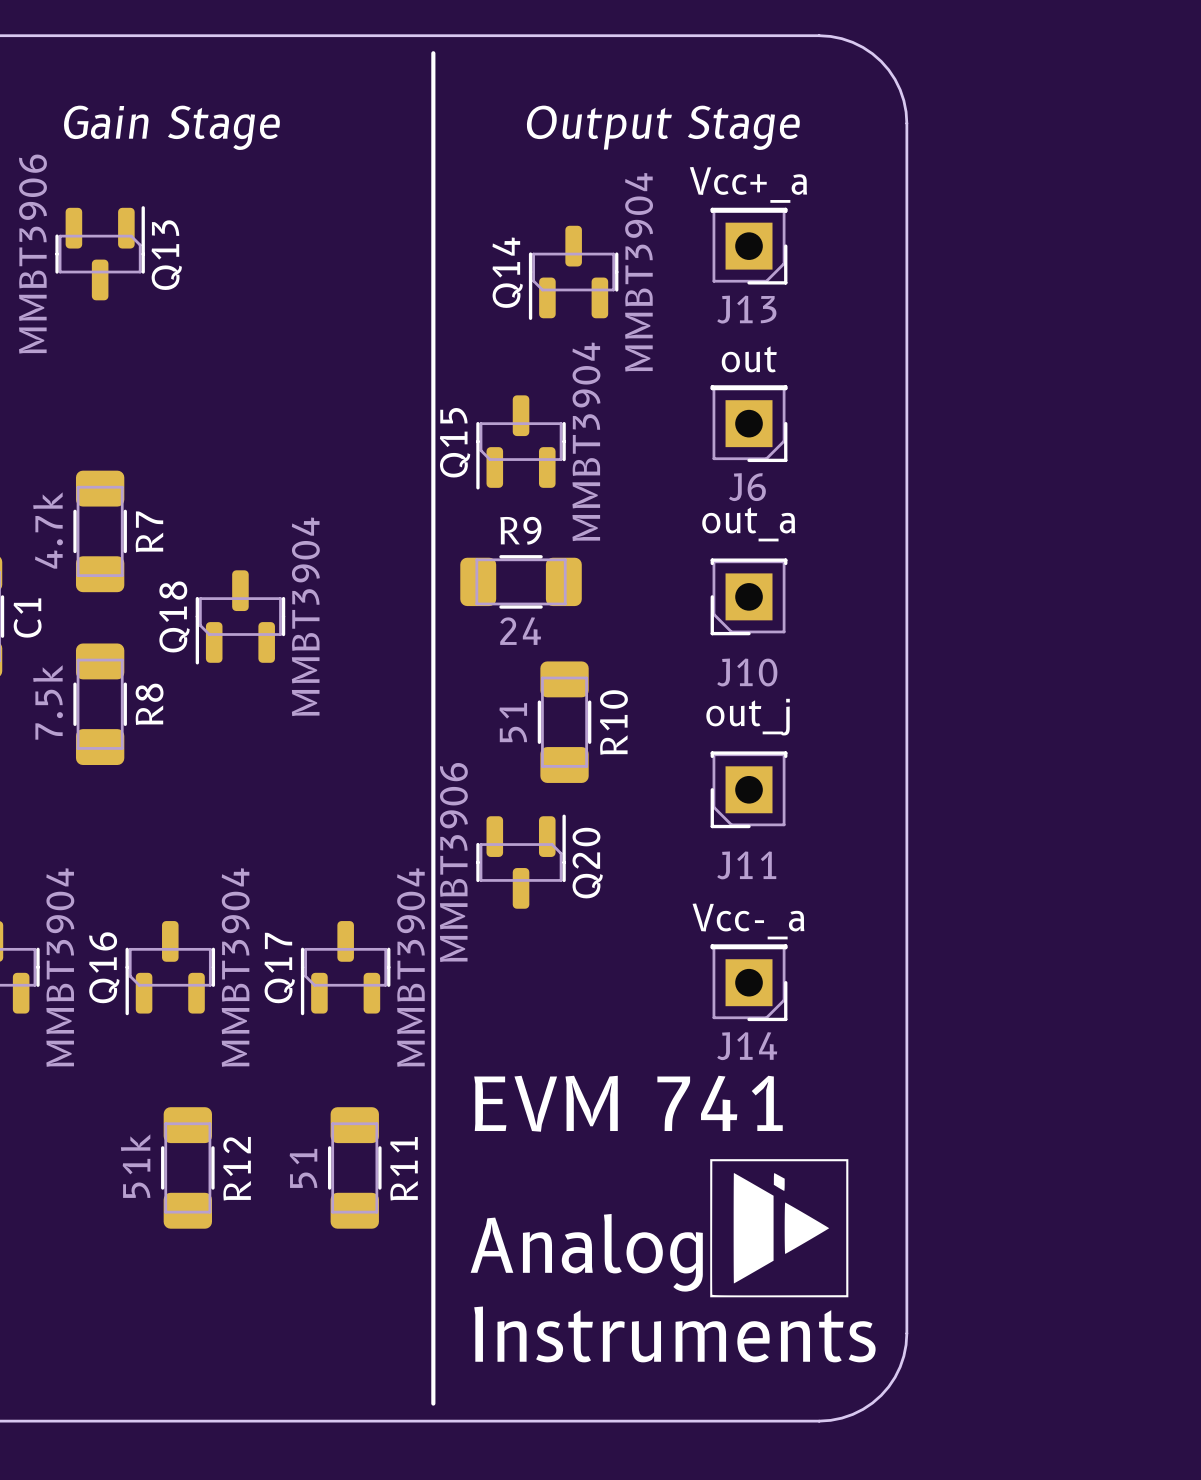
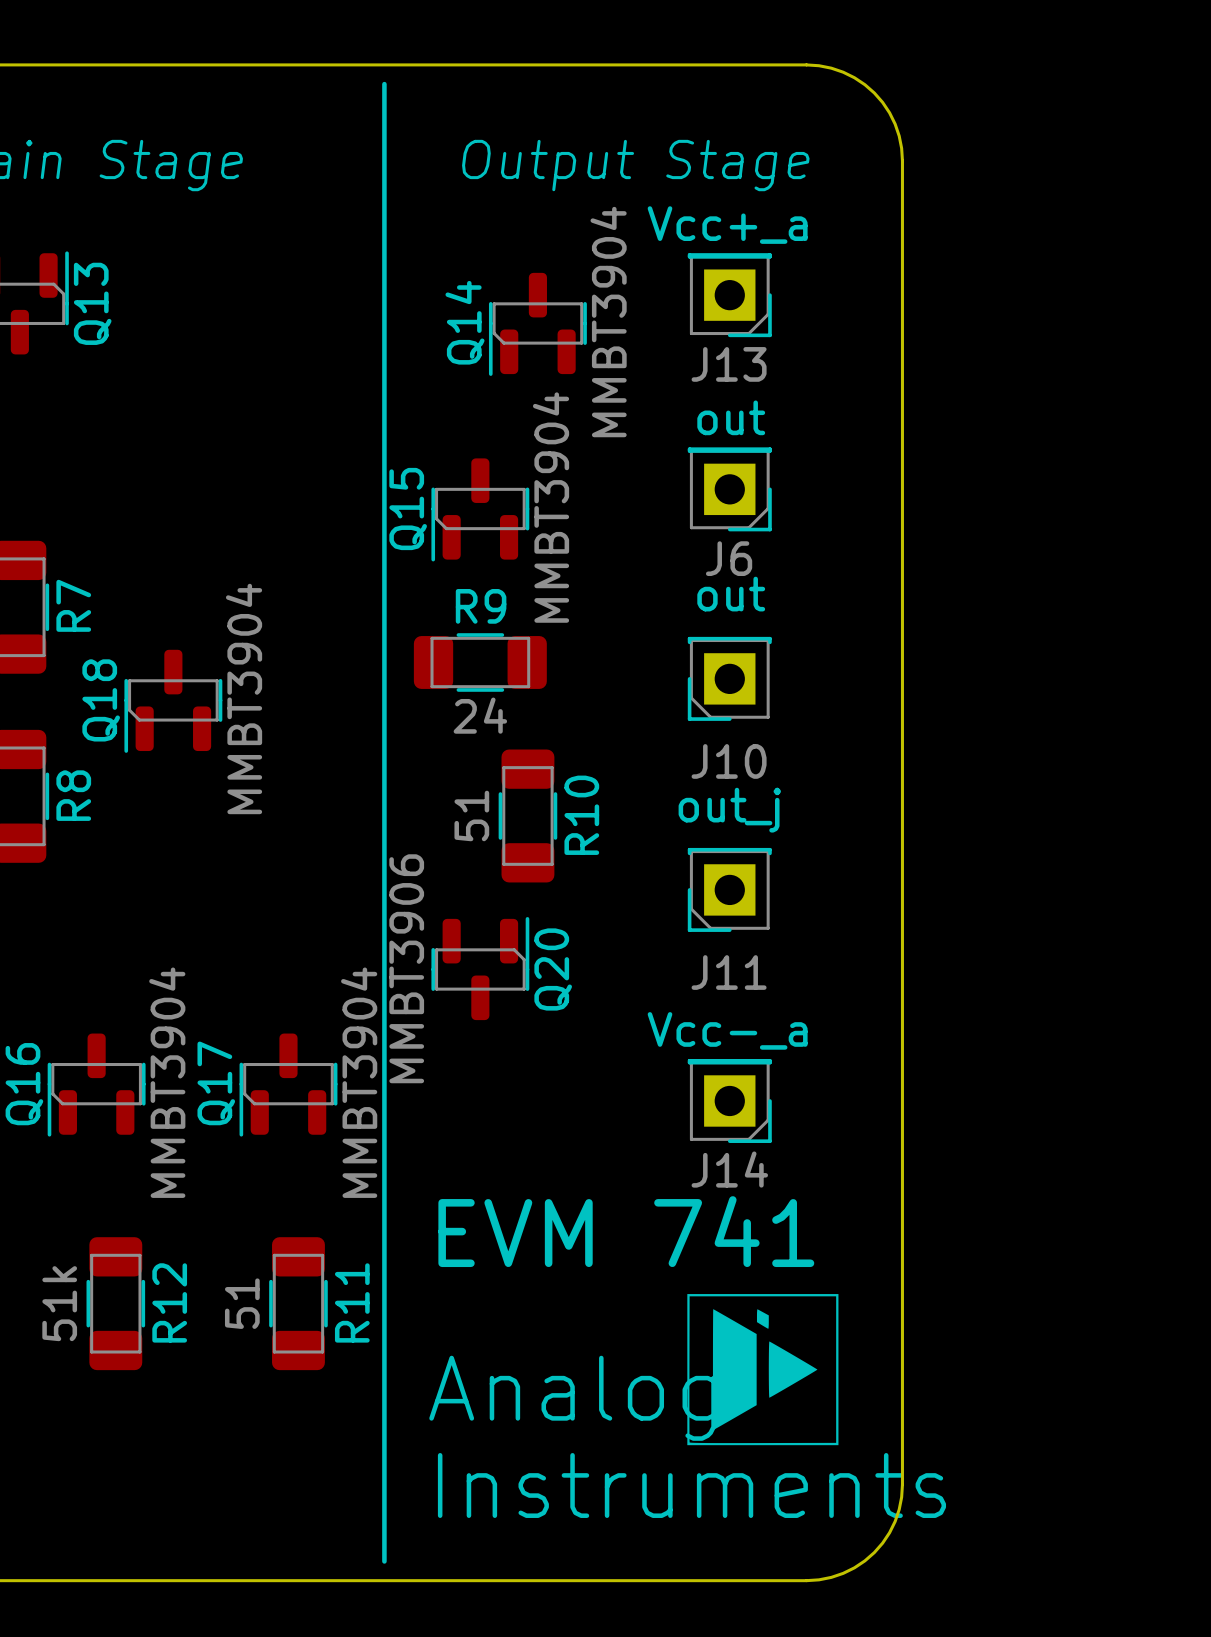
J10 value: out_a (748, 524) -> out (731, 594)

